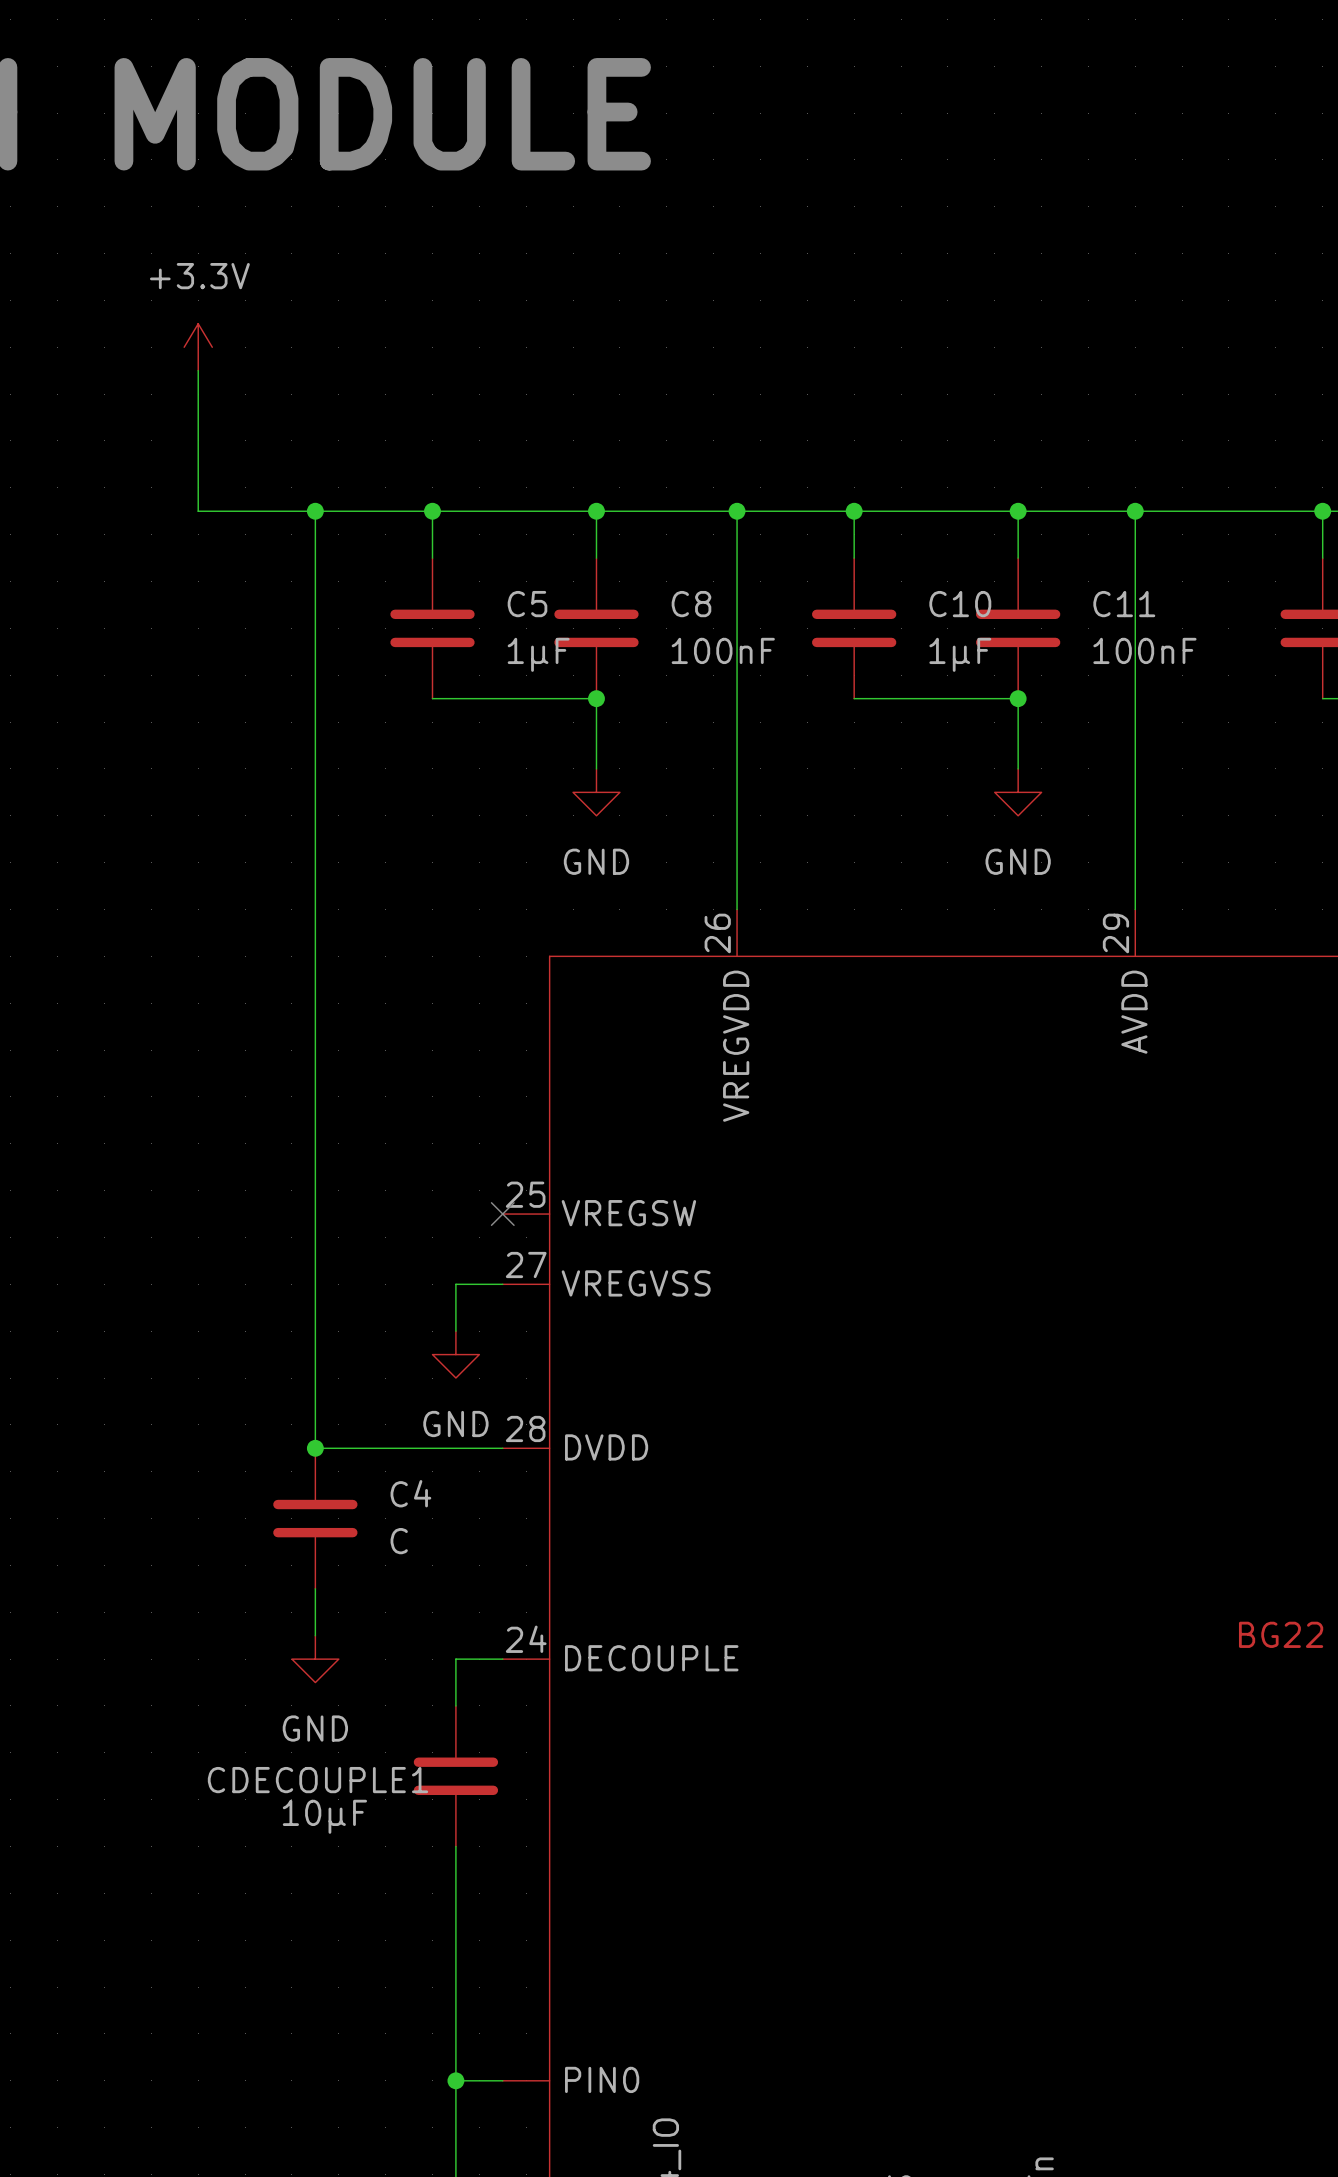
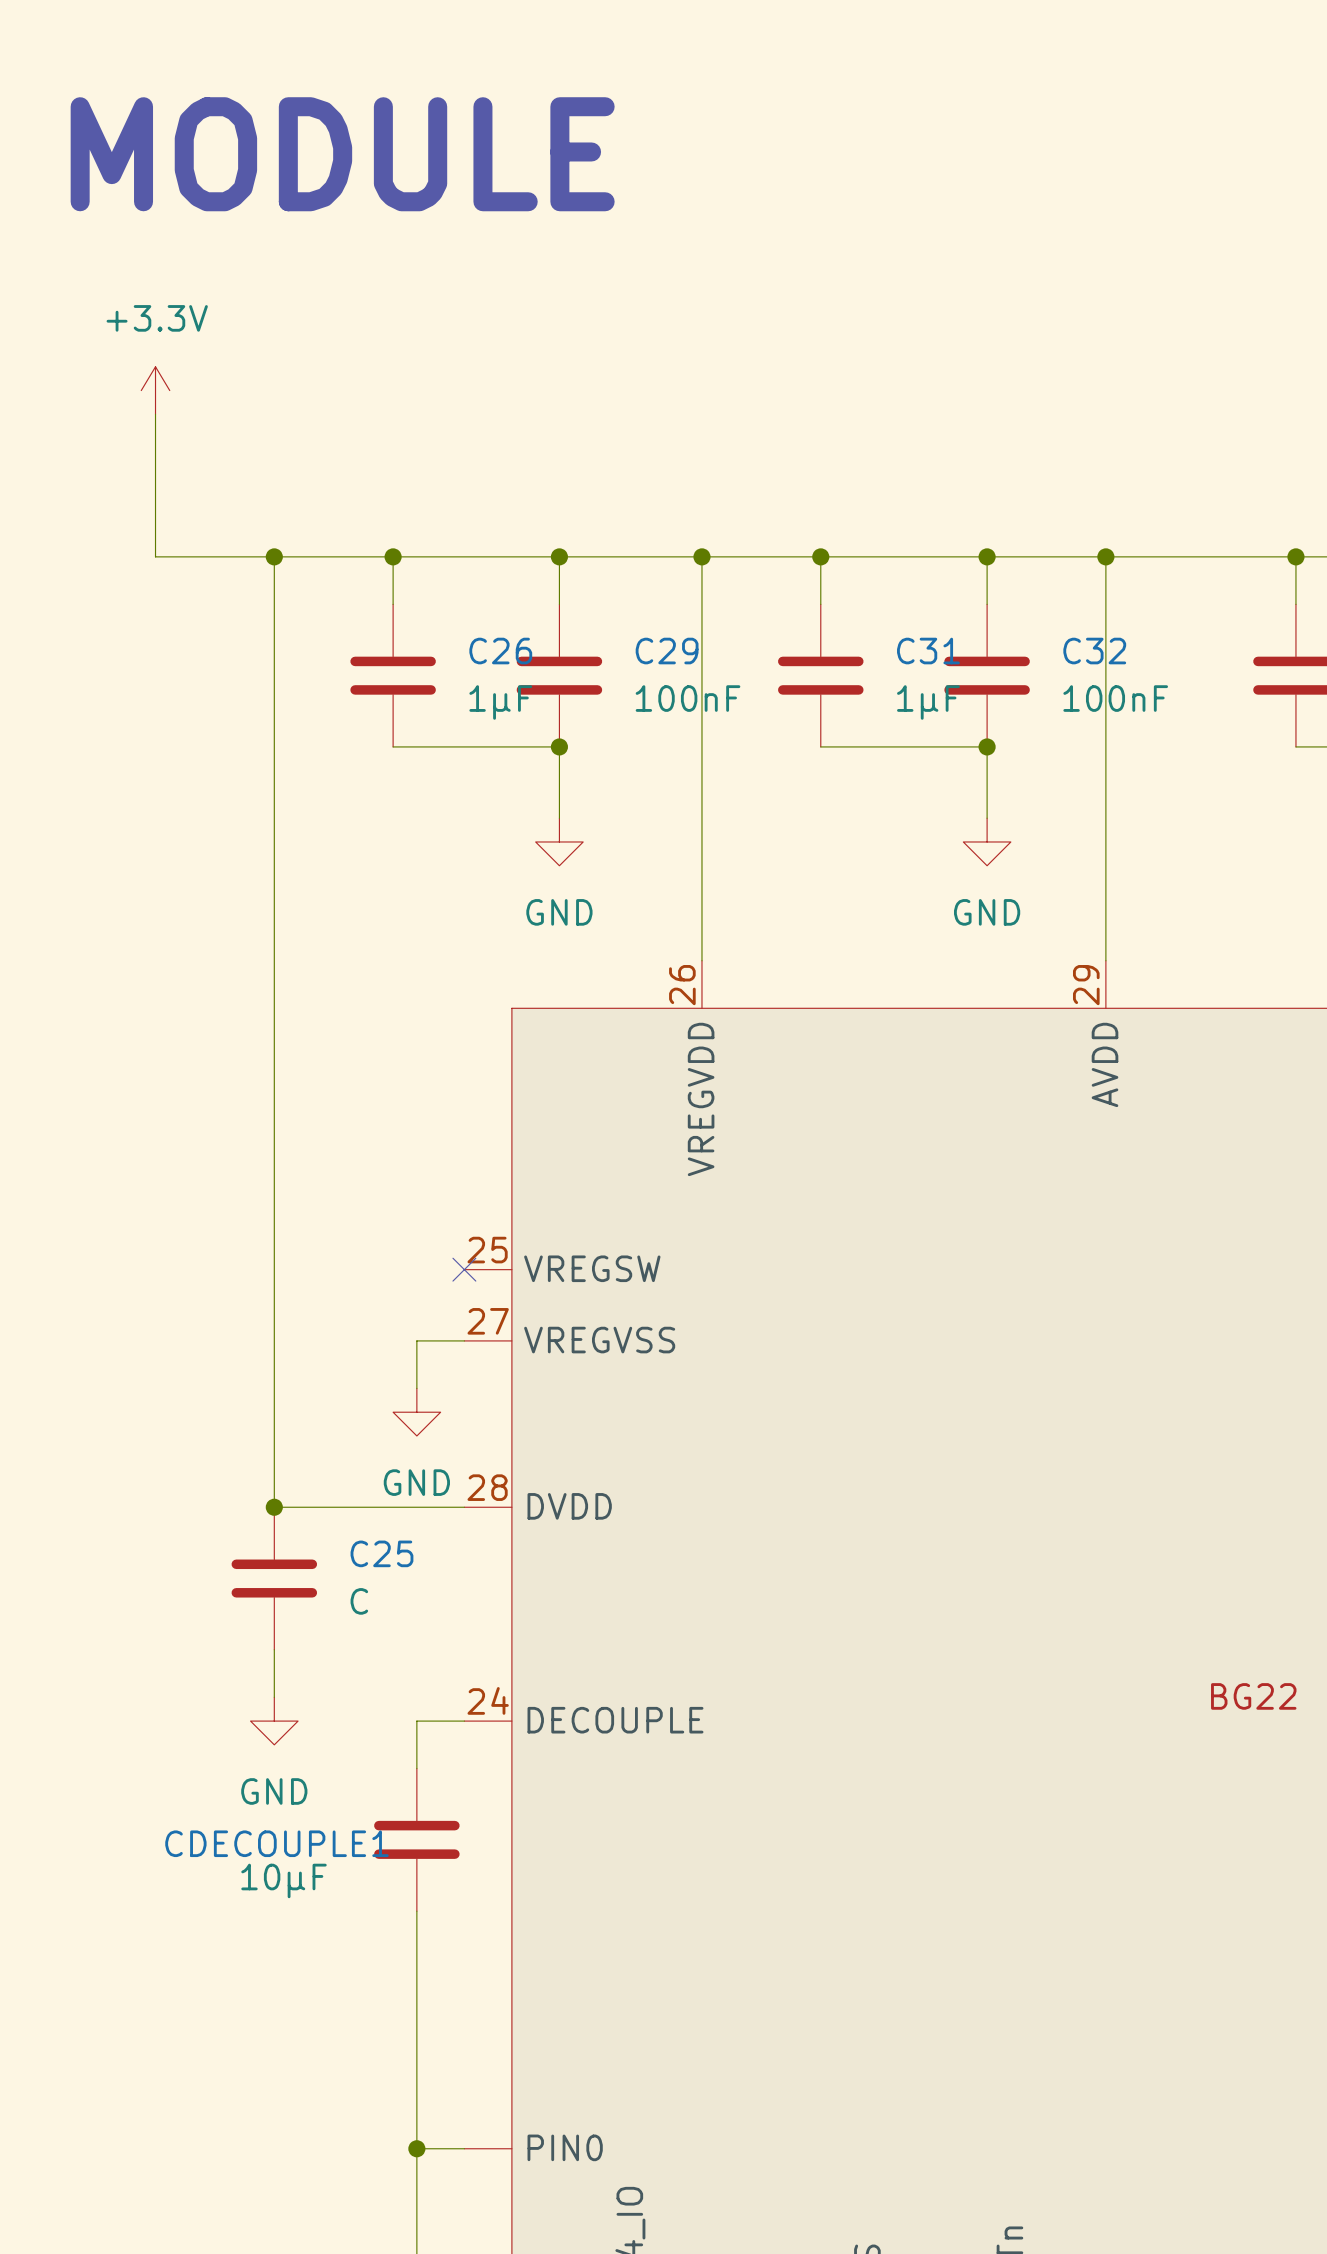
C5 name: C5 (527, 604) -> C26 (500, 651)
C8 name: C8 (691, 604) -> C29 (667, 651)
C10 name: C10 (960, 604) -> C31 (928, 651)
C11 name: C11 (1124, 604) -> C32 (1094, 651)
C4 name: C4 (410, 1493) -> C25 (381, 1553)

